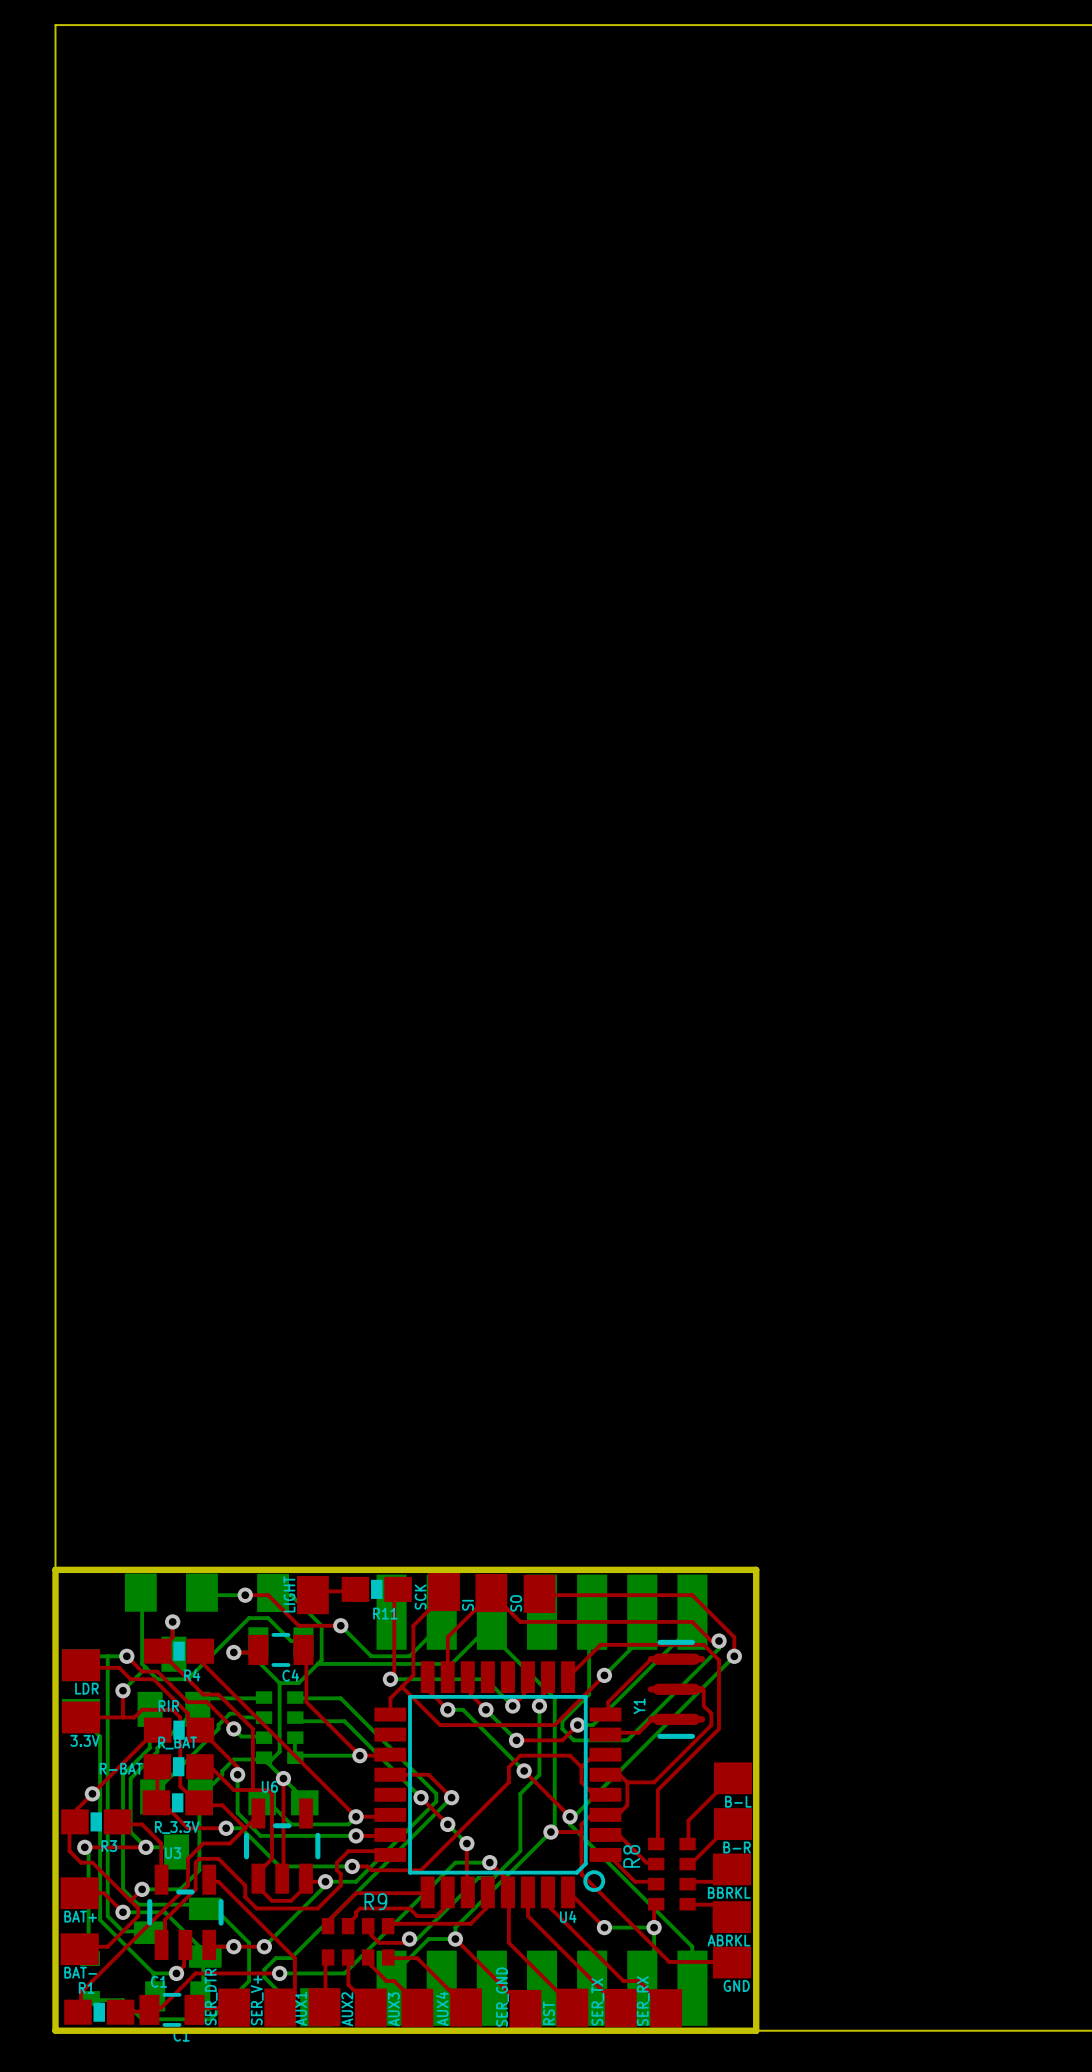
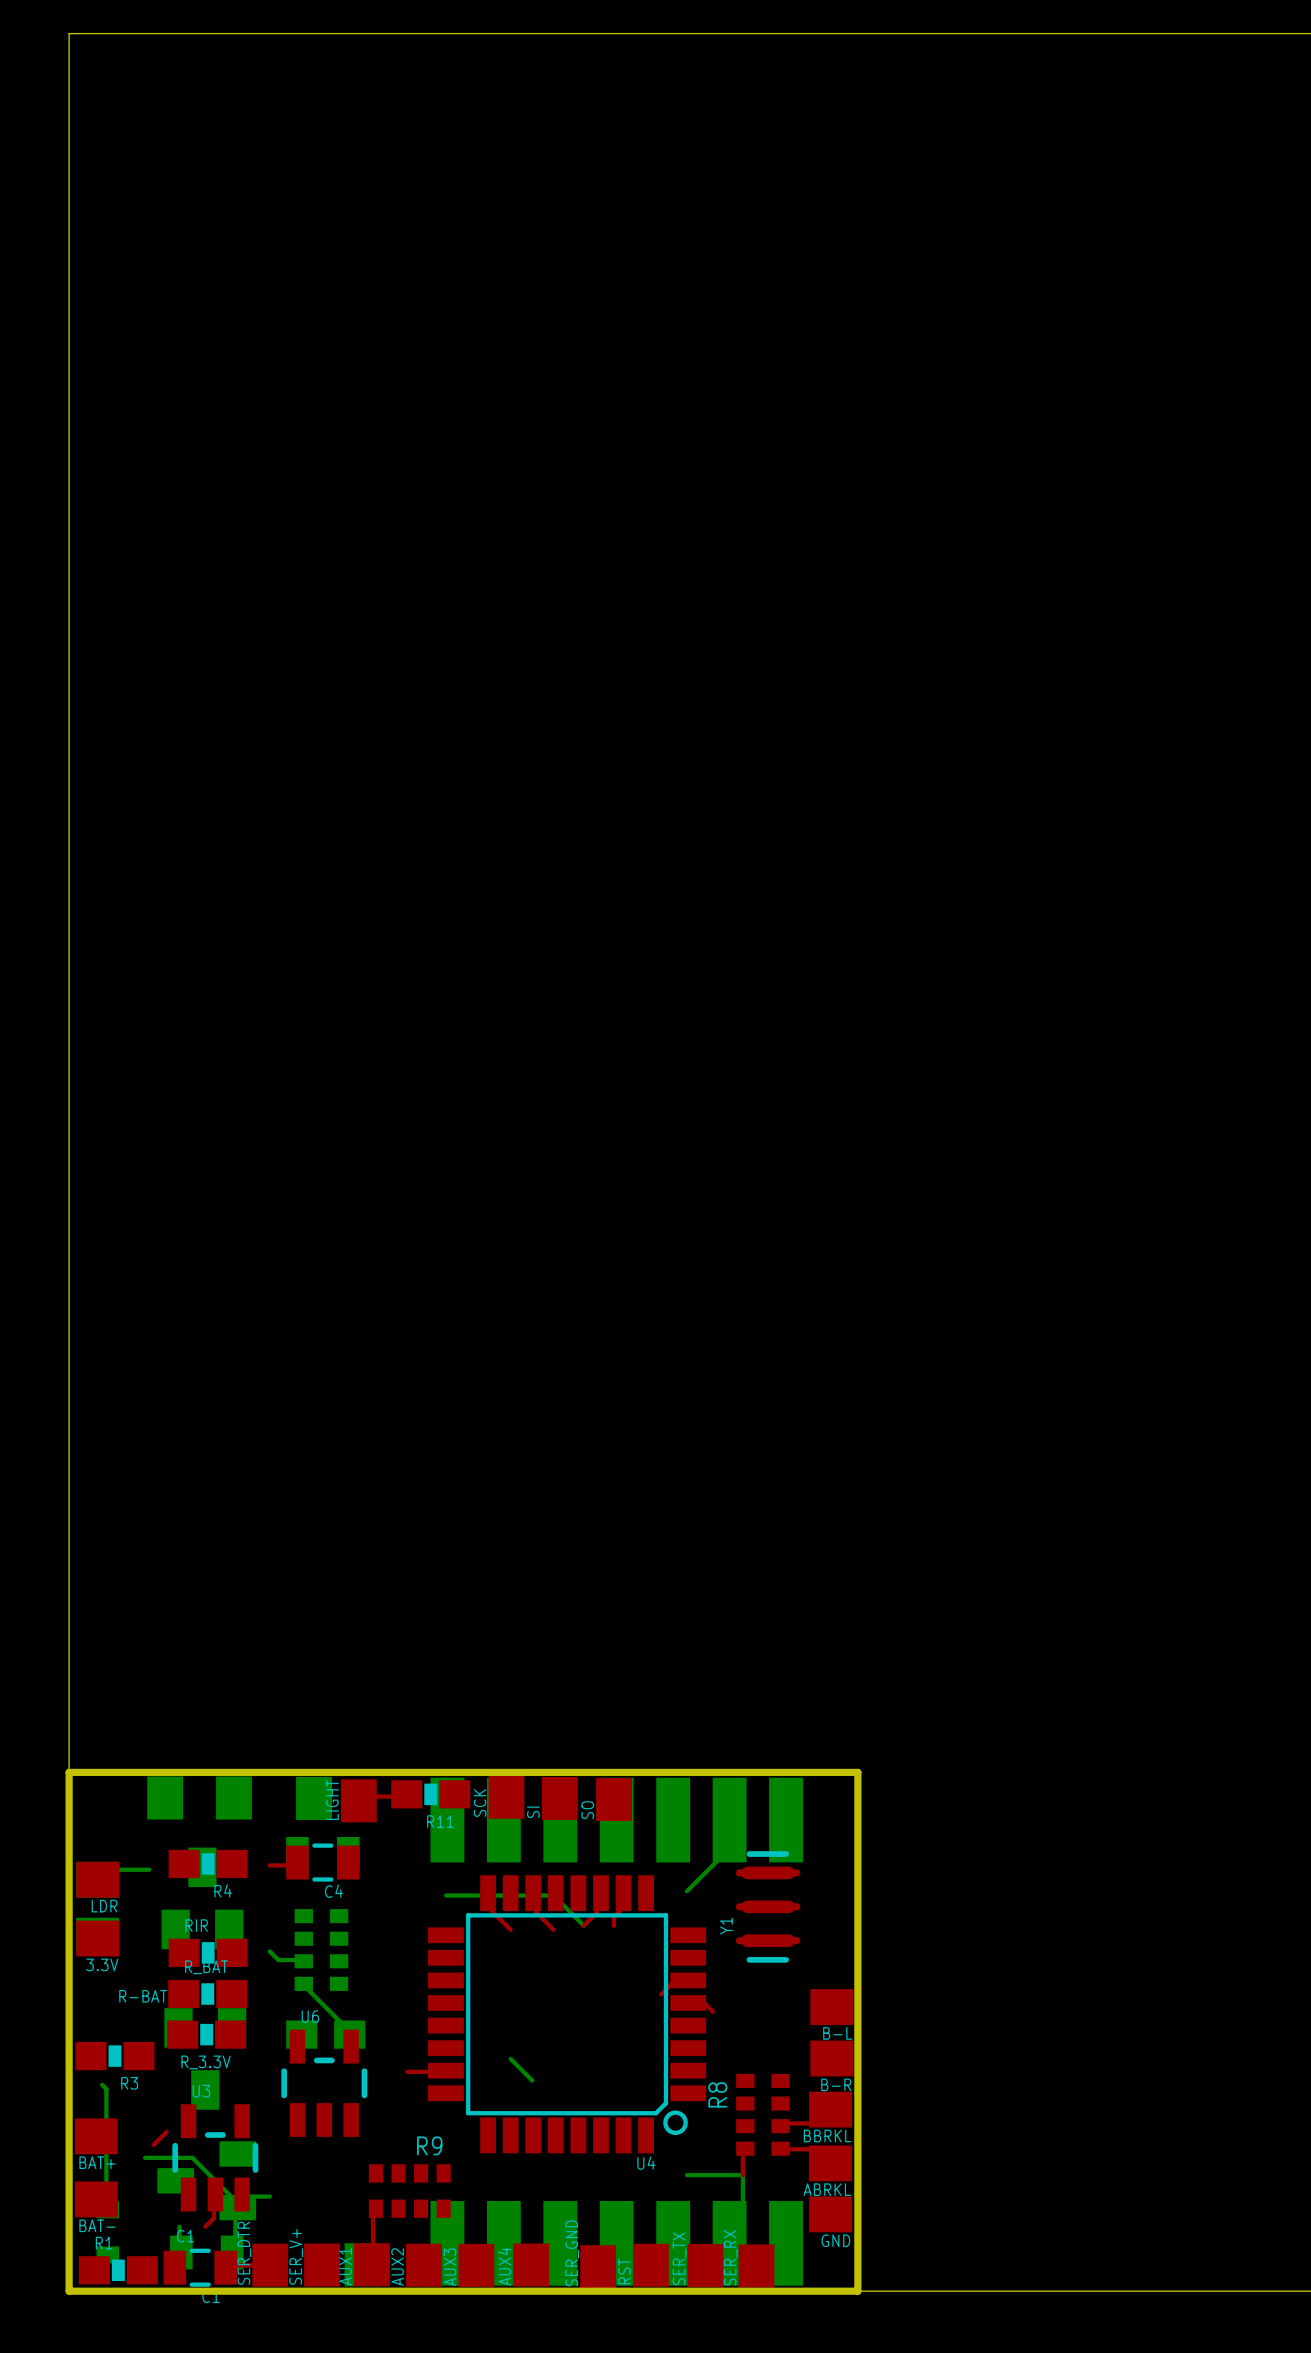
top track: (398, 1589) (394, 1591) (394, 1675) (390, 1679) -> none
top track: (444, 1591) (443, 1595) (413, 1625) (413, 1675) (390, 1698) (390, 1714) -> none
bottom track: (140, 1592) (142, 1663) (157, 1679) (187, 1679) (249, 1618) (268, 1618) (291, 1641) (303, 1642) -> none
bottom track: (201, 1592) (203, 1595) (245, 1595) -> none
bottom track: (273, 1592) (275, 1595) (291, 1595) (321, 1625) (321, 1660) (298, 1683) (279, 1683) -> none
top track: (539, 1593) (692, 1595) (734, 1637) (734, 1656) -> none
top track: (245, 1595) (268, 1595) (298, 1625) (340, 1625) -> none
via: (245, 1595) -> none
bottom track: (441, 1612) (440, 1625) (409, 1656) (371, 1656) (340, 1625) -> none
bottom track: (592, 1612) (589, 1614) (589, 1694) (562, 1721) (562, 1728) (573, 1740) (627, 1740) (719, 1648) (719, 1641) -> none
bottom track: (692, 1612) (692, 1625) (592, 1725) (577, 1725) -> none
top track: (172, 1621) (172, 1637) (157, 1651) (203, 1694) (218, 1694) (252, 1728) (252, 1790) -> none
via: (172, 1621) -> none
via: (340, 1625) -> none
top track: (719, 1641) (711, 1641) (692, 1621) (520, 1621) (491, 1592) (447, 1637) (447, 1677) -> none
via: (719, 1641) -> none
top track: (303, 1649) (306, 1652) (306, 1702) (359, 1755) (390, 1754) -> none
top track: (200, 1651) (203, 1652) (203, 1663) (356, 1816) (386, 1816) (390, 1814) -> none
via: (233, 1652) -> none
bottom track: (249, 1652) (279, 1683) -> none
bottom track: (107, 1656) (107, 1916) (123, 1931) (150, 1932) -> none
top track: (126, 1656) (142, 1671) (157, 1671) (187, 1702) (207, 1702) (233, 1728) -> none
via: (126, 1656) -> none
bottom track: (734, 1656) (570, 1820) -> none
via: (734, 1656) -> none
top track: (650, 1659) (608, 1702) (608, 1713) (605, 1714) -> none
bottom track: (317, 1663) (451, 1663) (489, 1625) (489, 1614) (491, 1612) (485, 1629) (554, 1698) (554, 1828) (455, 1927) (455, 1939) (428, 1939) (394, 1973) (394, 1984) (391, 1988) -> none
top track: (80, 1665) (80, 1667) (119, 1667) (130, 1679) (153, 1679) (187, 1713) (187, 1717) (237, 1767) (237, 1774) -> none
bottom track: (145, 1667) (123, 1690) -> none
top track: (604, 1675) (554, 1725) (440, 1725) (401, 1686) -> none
via: (604, 1675) -> none
top track: (568, 1677) (600, 1644) (703, 1644) (719, 1660) (719, 1728) (657, 1790) (657, 1843) (656, 1844) -> none
via: (390, 1679) -> none
bottom track: (279, 1683) (279, 1751) (268, 1763) (263, 1757) (260, 1759) (233, 1759) (222, 1770) (222, 1774) (199, 1797) (199, 1870) (180, 1889) (142, 1889) -> none
top track: (676, 1689) (703, 1690) (703, 1705) (711, 1713) (711, 1725) (654, 1782) (627, 1782) (627, 1805) (619, 1812) (608, 1812) (604, 1816) (589, 1816) (581, 1824) (581, 1874) (669, 1961) (732, 1962) -> none
top track: (123, 1690) (123, 1717) -> none
via: (123, 1690) -> none
bottom track: (263, 1697) (207, 1698) (157, 1748) (157, 1751) (130, 1778) (130, 1832) (145, 1847) (172, 1847) (176, 1852) -> none
bottom track: (295, 1697) (340, 1698) (436, 1793) (436, 1801) (356, 1881) (325, 1881) -> none
via: (512, 1705) -> none
bottom track: (539, 1705) (539, 1774) (520, 1793) (520, 1851) (493, 1877) (478, 1877) (417, 1939) (409, 1939) -> none
via: (539, 1705) -> none
bottom track: (150, 1709) (149, 1748) (123, 1774) (123, 1889) (138, 1904) (199, 1904) (207, 1912) (218, 1912) (249, 1942) (249, 1981) (210, 2019) (142, 2019) (123, 2000) (89, 1998) -> none
bottom track: (447, 1709) (463, 1709) (524, 1770) -> none
via: (447, 1709) -> none
bottom track: (485, 1709) (516, 1740) -> none
via: (485, 1709) -> none
bottom track: (80, 1714) (80, 1717) (100, 1736) (100, 1919) (153, 1973) (176, 1973) -> none
top track: (80, 1717) (134, 1717) (142, 1709) (172, 1709) (180, 1717) (180, 1786) (199, 1805) (222, 1805) (245, 1828) -> none
bottom track: (263, 1717) (241, 1717) (237, 1713) (229, 1713) (218, 1725) (218, 1728) (152, 1796) -> none
bottom track: (295, 1717) (298, 1721) (344, 1721) (421, 1797) -> none
top track: (650, 1719) (638, 1732) (608, 1732) (605, 1734) -> none
top track: (577, 1725) (562, 1740) (516, 1740) -> none
via: (577, 1725) -> none
via: (233, 1728) -> none
top track: (157, 1730) (77, 1809) (77, 1820) (69, 1828) (69, 1851) (80, 1862) (92, 1862) (138, 1908) (138, 1916) (107, 1946) (80, 1946) (79, 1949) -> none
bottom track: (295, 1737) (295, 1757) (298, 1755) (359, 1755) -> none
via: (516, 1740) -> none
via: (359, 1755) -> none
top track: (199, 1766) (210, 1767) (233, 1790) (268, 1790) (272, 1793) (272, 1858) (260, 1870) (260, 1877) (258, 1878) (260, 1881) (260, 1889) (272, 1900) (291, 1900) (310, 1881) (306, 1878) (306, 1881) (325, 1881) -> none
top track: (157, 1767) (157, 1805) (165, 1805) (187, 1828) (226, 1828) -> none
top track: (524, 1770) (570, 1816) -> none
via: (524, 1770) -> none
bottom track: (237, 1774) (237, 1812) (260, 1835) (356, 1835) -> none
via: (237, 1774) -> none
top track: (390, 1774) (428, 1774) (451, 1797) -> none
top track: (283, 1778) (282, 1878) -> none
via: (283, 1778) -> none
top track: (733, 1778) (730, 1778) (688, 1820) (687, 1844) -> none
via: (92, 1793) -> none
top track: (605, 1794) (592, 1793) (581, 1782) (581, 1767) (570, 1755) (520, 1755) (508, 1767) (508, 1782) (421, 1870) (371, 1870) (367, 1866) (352, 1866) -> none
top track: (421, 1797) (447, 1824) -> none
via: (421, 1797) -> none
bottom track: (451, 1797) (291, 1958) (275, 1958) (264, 1969) (264, 1977) (291, 2004) (314, 2004) (316, 2007) -> none
via: (451, 1797) -> none
bottom track: (262, 1802) (264, 1805) (272, 1805) (291, 1824) (348, 1824) (356, 1816) -> none
top track: (258, 1813) (229, 1843) (203, 1843) (187, 1858) (187, 1885) (80, 1992) (80, 2011) (77, 2012) -> none
via: (356, 1816) -> none
bottom track: (570, 1816) (570, 1824) (692, 1946) (692, 1988) -> none
via: (570, 1816) -> none
top track: (117, 1821) (119, 1824) (142, 1824) (161, 1843) (161, 1879) -> none
via: (447, 1824) -> none
top track: (733, 1824) (692, 1862) (687, 1864) -> none
bottom track: (226, 1828) (241, 1828) (279, 1866) (352, 1866) -> none
via: (226, 1828) -> none
top track: (550, 1832) (581, 1832) -> none
via: (550, 1832) -> none
top track: (605, 1834) (619, 1835) (646, 1862) (656, 1864) -> none
via: (356, 1835) -> none
top track: (466, 1843) (467, 1892) -> none
via: (466, 1843) -> none
top track: (84, 1847) (145, 1847) -> none
via: (84, 1847) -> none
via: (145, 1847) -> none
top track: (390, 1854) (386, 1851) (348, 1851) (336, 1862) (336, 1870) (340, 1874) (340, 1885) (317, 1908) (256, 1908) (245, 1897) (245, 1885) (218, 1858) (199, 1858) (195, 1862) (195, 1889) (165, 1919) (165, 1942) (161, 1944) -> none
top track: (605, 1854) (608, 1854) (634, 1881) (654, 1881) (656, 1884) -> none
bottom track: (489, 1862) (455, 1862) (344, 1973) (279, 1973) -> none
top track: (489, 1862) (505, 1877) (505, 1889) (508, 1893) (508, 1942) (572, 2007) -> none
via: (489, 1862) -> none
via: (352, 1866) -> none
top track: (209, 1879) (210, 1881) (218, 1881) (294, 1958) (294, 1992) (280, 2007) -> none
via: (325, 1881) -> none
bottom track: (329, 1881) (264, 1946) -> none
via: (142, 1889) -> none
top track: (427, 1892) (356, 1893) (329, 1919) (328, 1926) -> none
top track: (447, 1892) (443, 1893) (443, 1908) (436, 1916) (417, 1916) (409, 1908) (359, 1908) (348, 1926) -> none
top track: (487, 1892) (485, 1893) (485, 1908) (470, 1923) (390, 1923) (388, 1926) -> none
top track: (527, 1892) (528, 1916) (620, 2008) -> none
top track: (548, 1892) (550, 1893) (550, 1908) (623, 1981) (638, 1981) (666, 2008) -> none
top track: (568, 1892) (604, 1927) -> none
top track: (79, 1893) (103, 1893) (123, 1912) -> none
via: (123, 1912) -> none
top track: (368, 1926) (371, 1927) (371, 1935) (378, 1942) (405, 1942) (409, 1939) -> none
via: (604, 1927) -> none
via: (654, 1927) -> none
via: (409, 1939) -> none
top track: (455, 1939) (525, 2009) -> none
via: (455, 1939) -> none
top track: (209, 1944) (210, 1946) (264, 1946) -> none
via: (233, 1946) -> none
via: (264, 1946) -> none
top track: (348, 1957) (348, 1984) (370, 2007) -> none
top track: (368, 1957) (371, 1958) (371, 1965) (386, 1981) (394, 1981) (417, 2004) (417, 2007) -> none
top track: (388, 1957) (417, 1958) (466, 2007) -> none
via: (176, 1973) -> none
top track: (279, 1973) (195, 1973) (161, 2007) (149, 2007) (145, 2011) (120, 2012) -> none
via: (279, 1973) -> none

